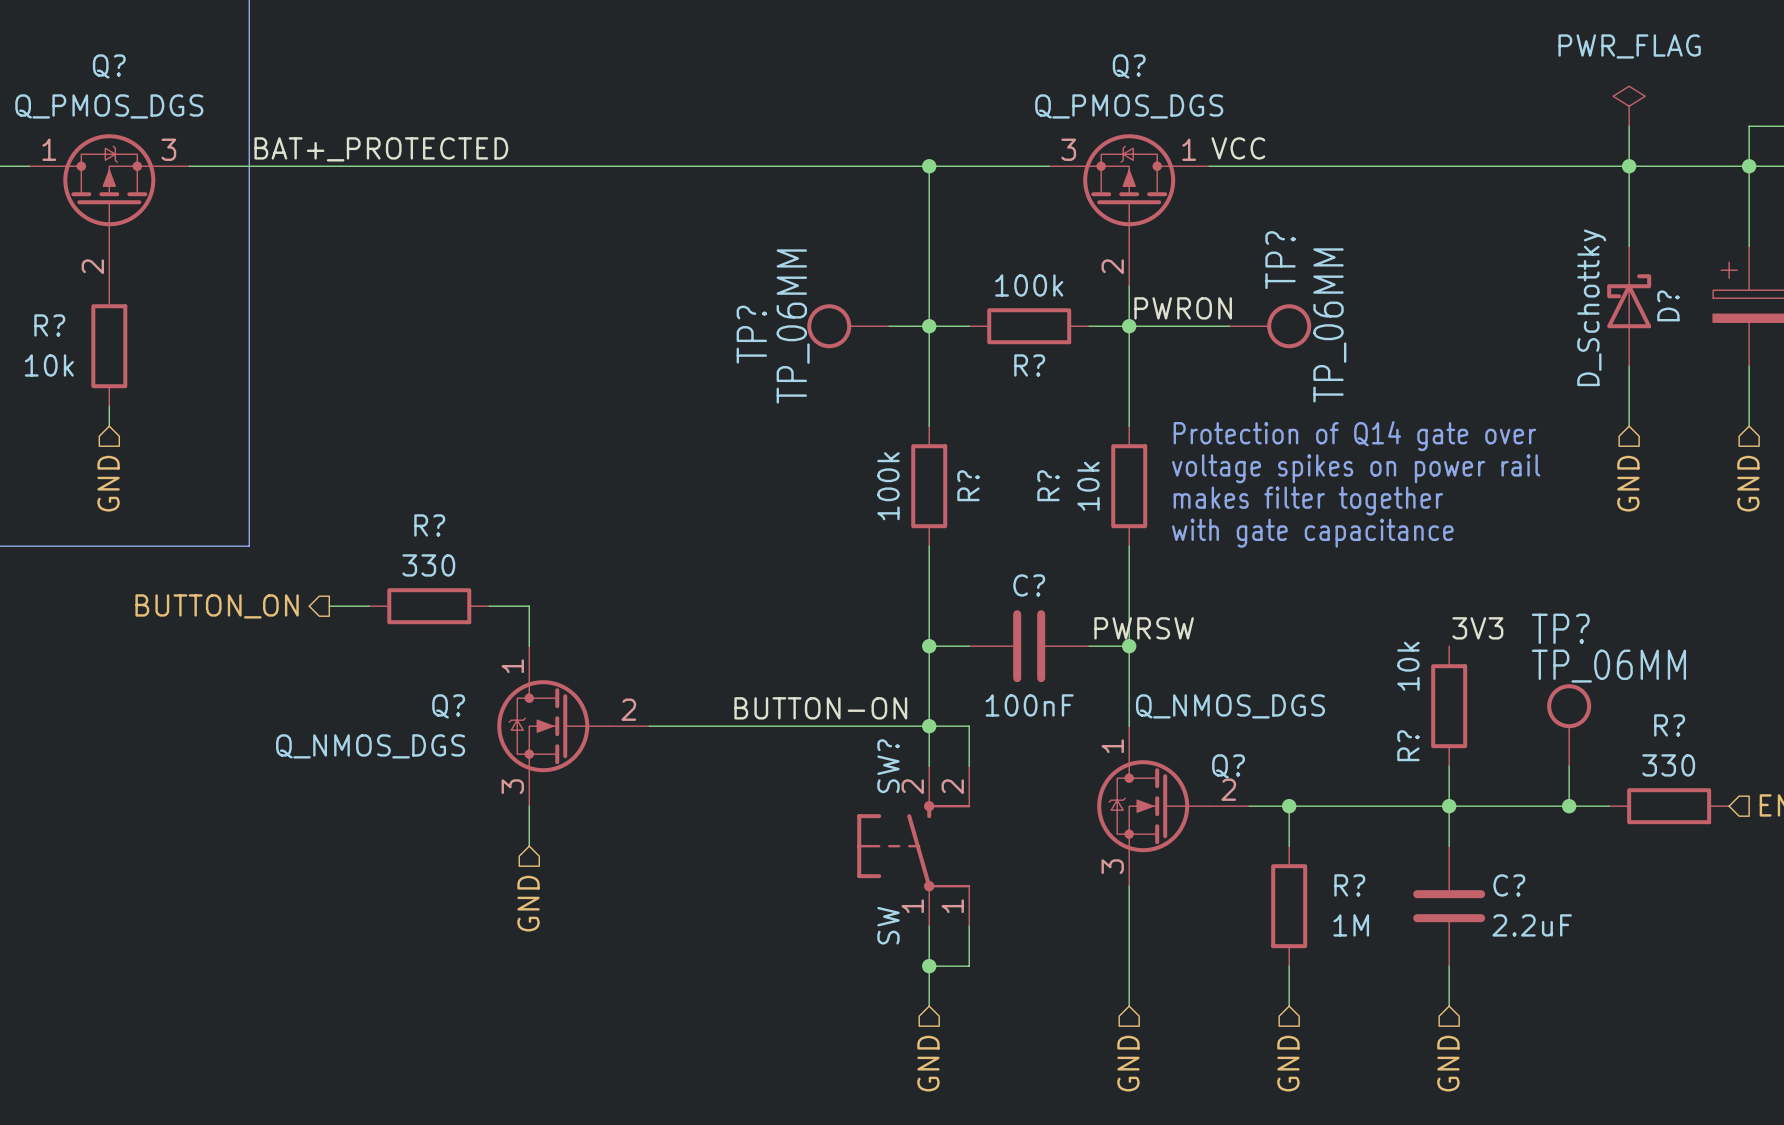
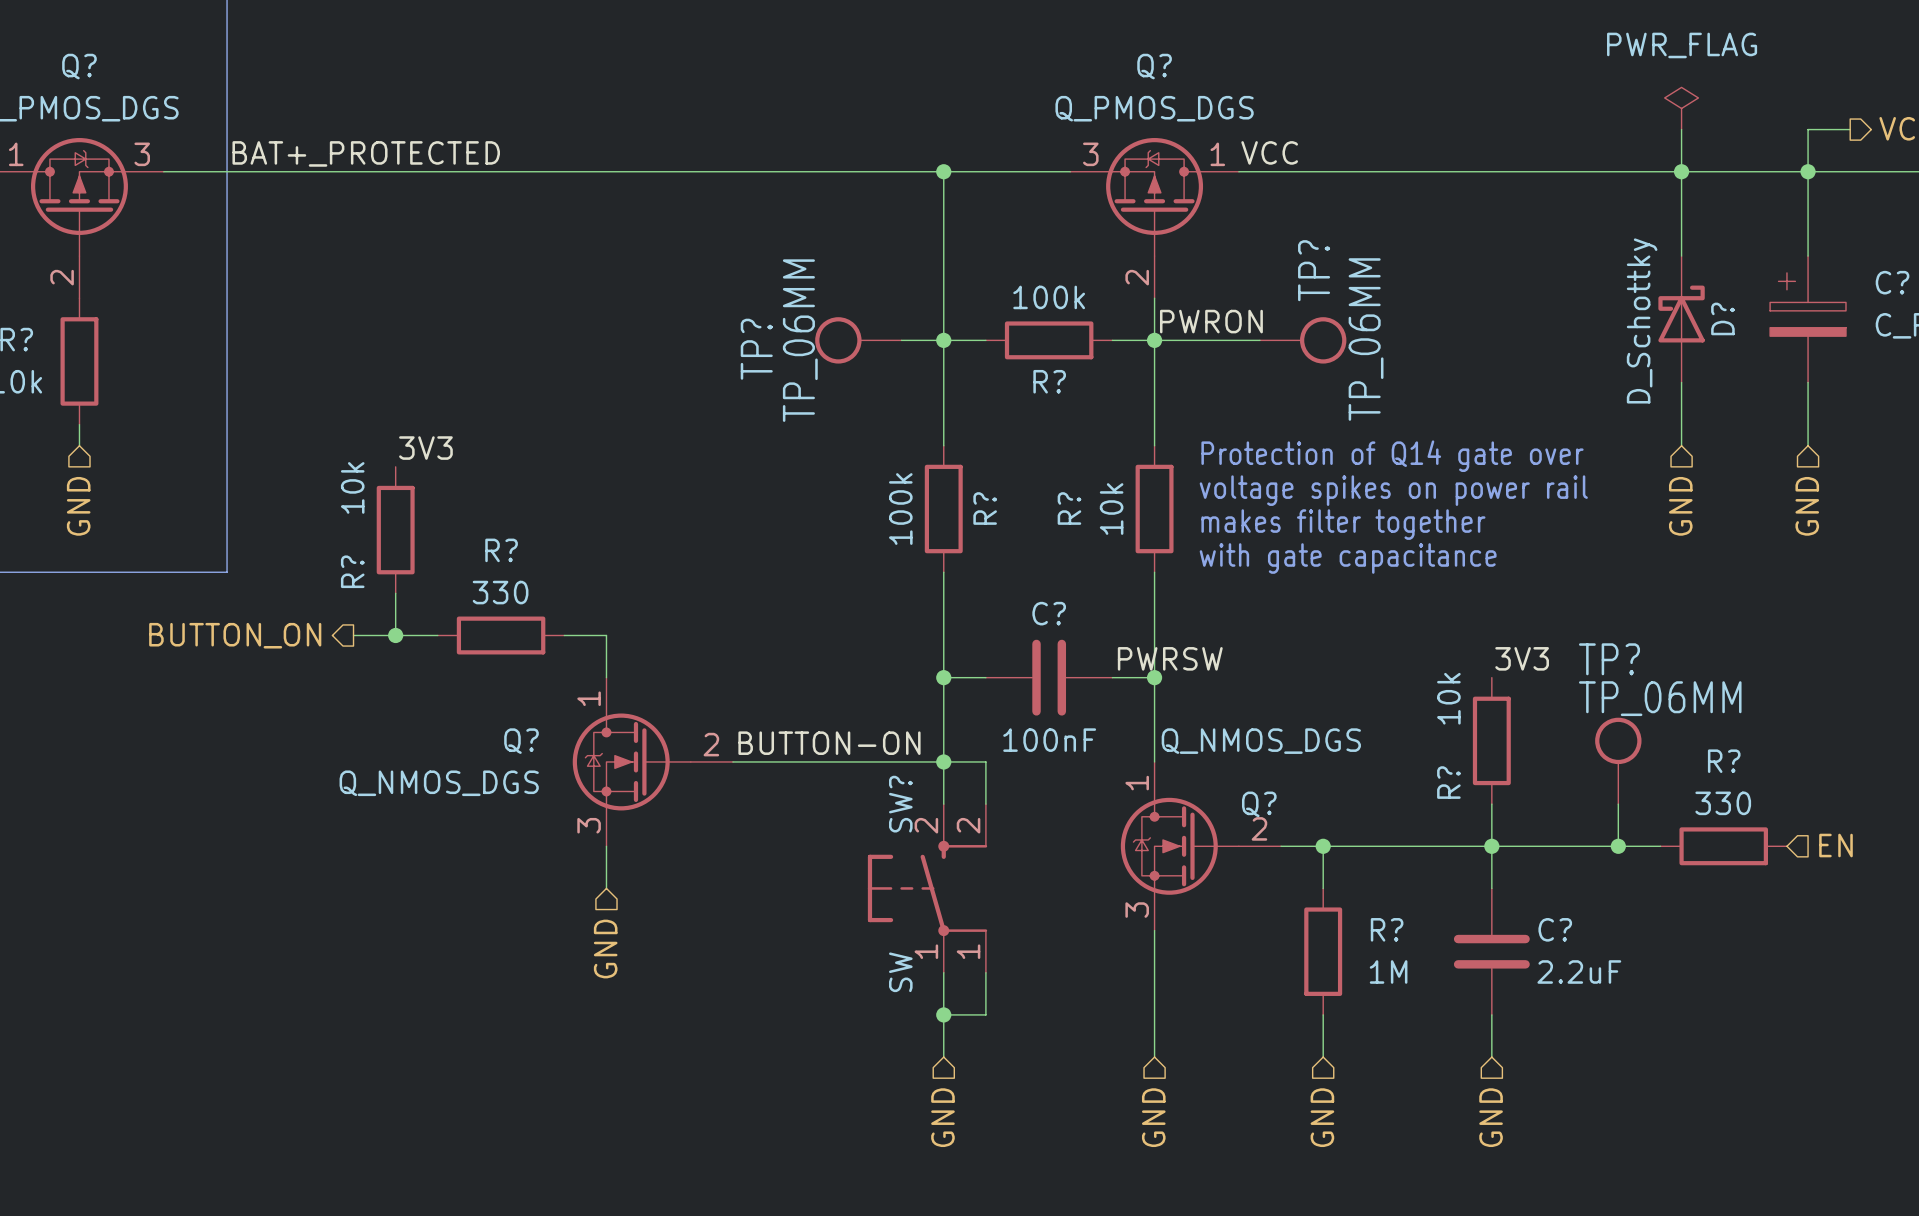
label: none -> 3V3 (425, 448)
R?: none -> 10k (395, 530)
wire: none -> (395, 593) (395, 635)
hierarchical label position: BUTTON_ON (217, 606) -> BUTTON_ON (235, 635)
wire: (329, 606) (369, 606) -> (437, 635) (353, 635)
junction: none -> (395, 635)
R? position: (429, 606) -> (501, 635)
wire: (489, 606) (529, 606) (529, 646) -> (564, 635) (606, 635) (606, 677)
Q? position: (573, 726) -> (652, 761)
wire: (529, 806) (529, 846) -> (606, 846) (606, 888)
hierarchical label position: GND (528, 903) -> GND (605, 949)

